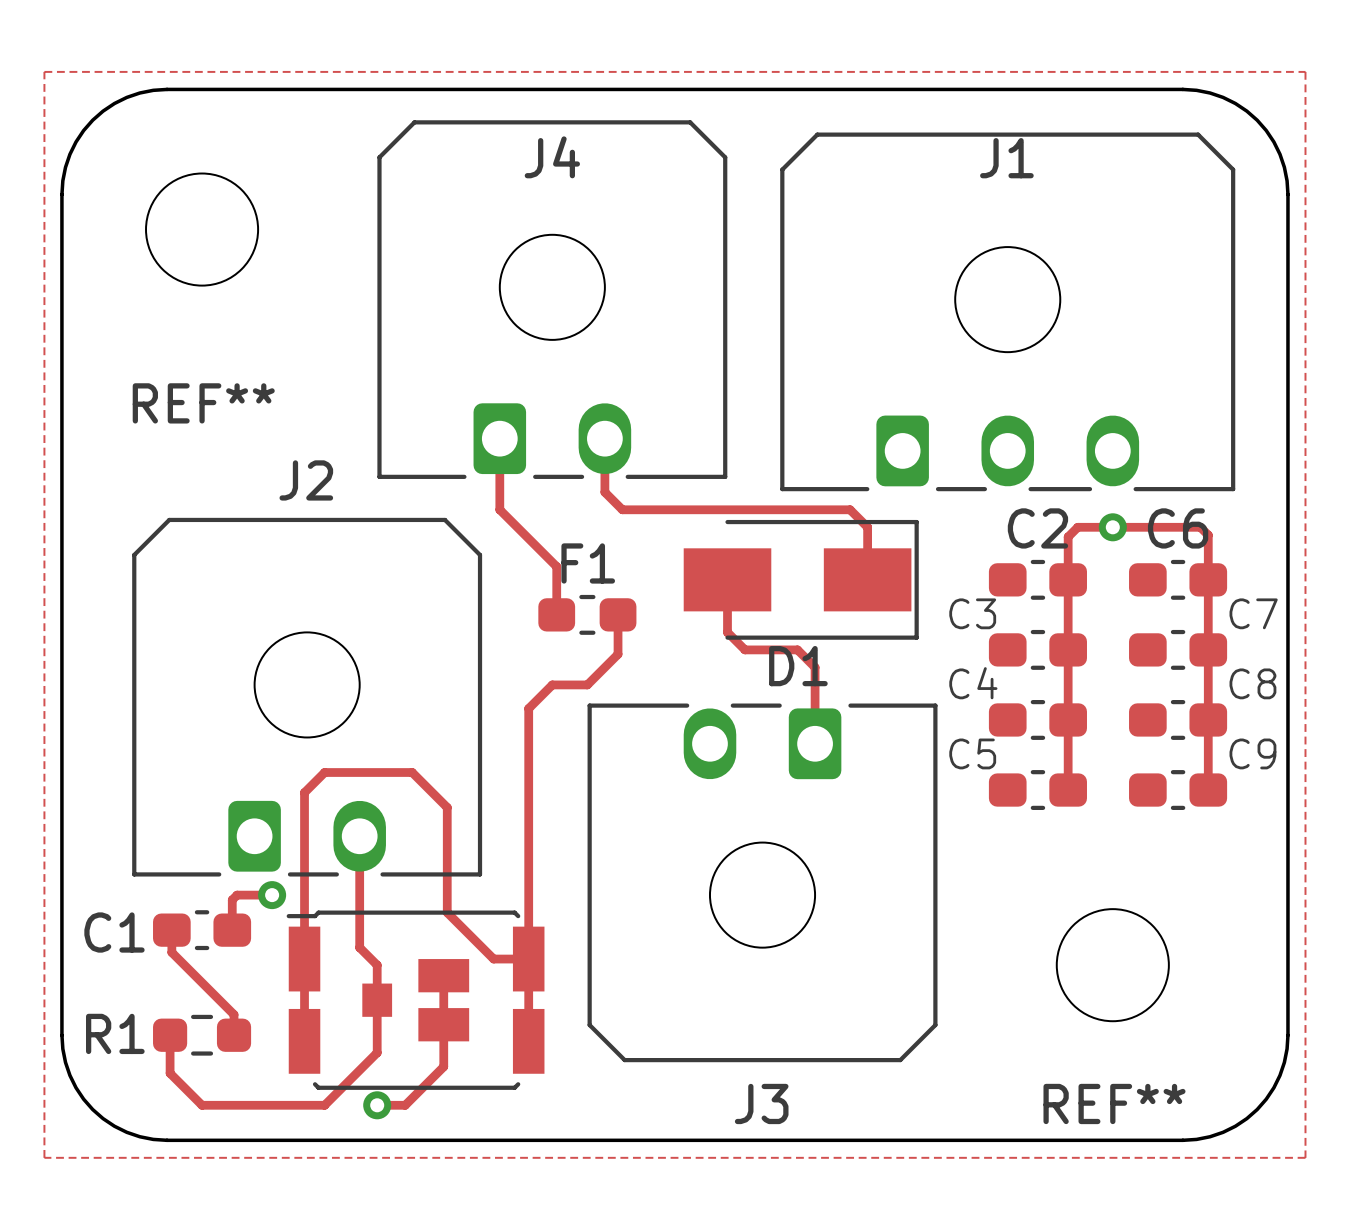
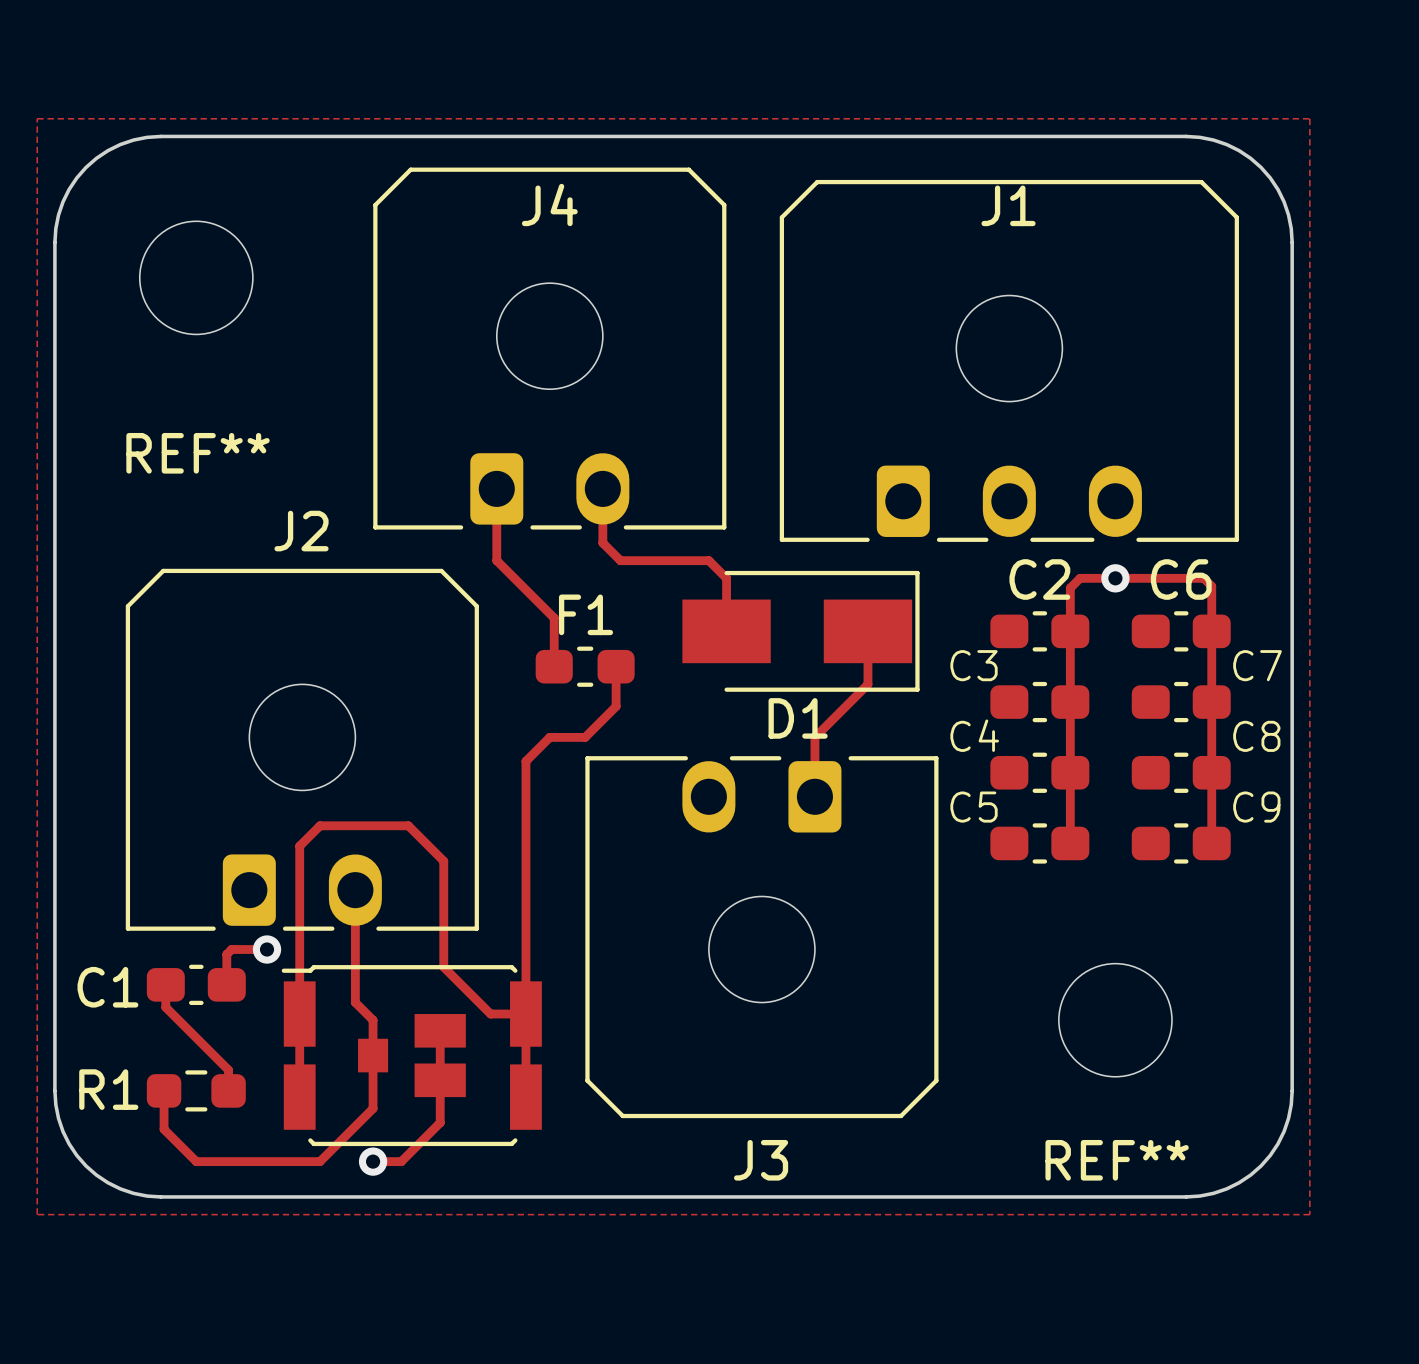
track: (709, 509) (850, 509) (867, 527) (867, 579) -> (708, 560) (726, 578) (726, 631)
track: (727, 579) (727, 632) (745, 649) (797, 649) (815, 667) (815, 684) -> (867, 631) (867, 684) (814, 737)

